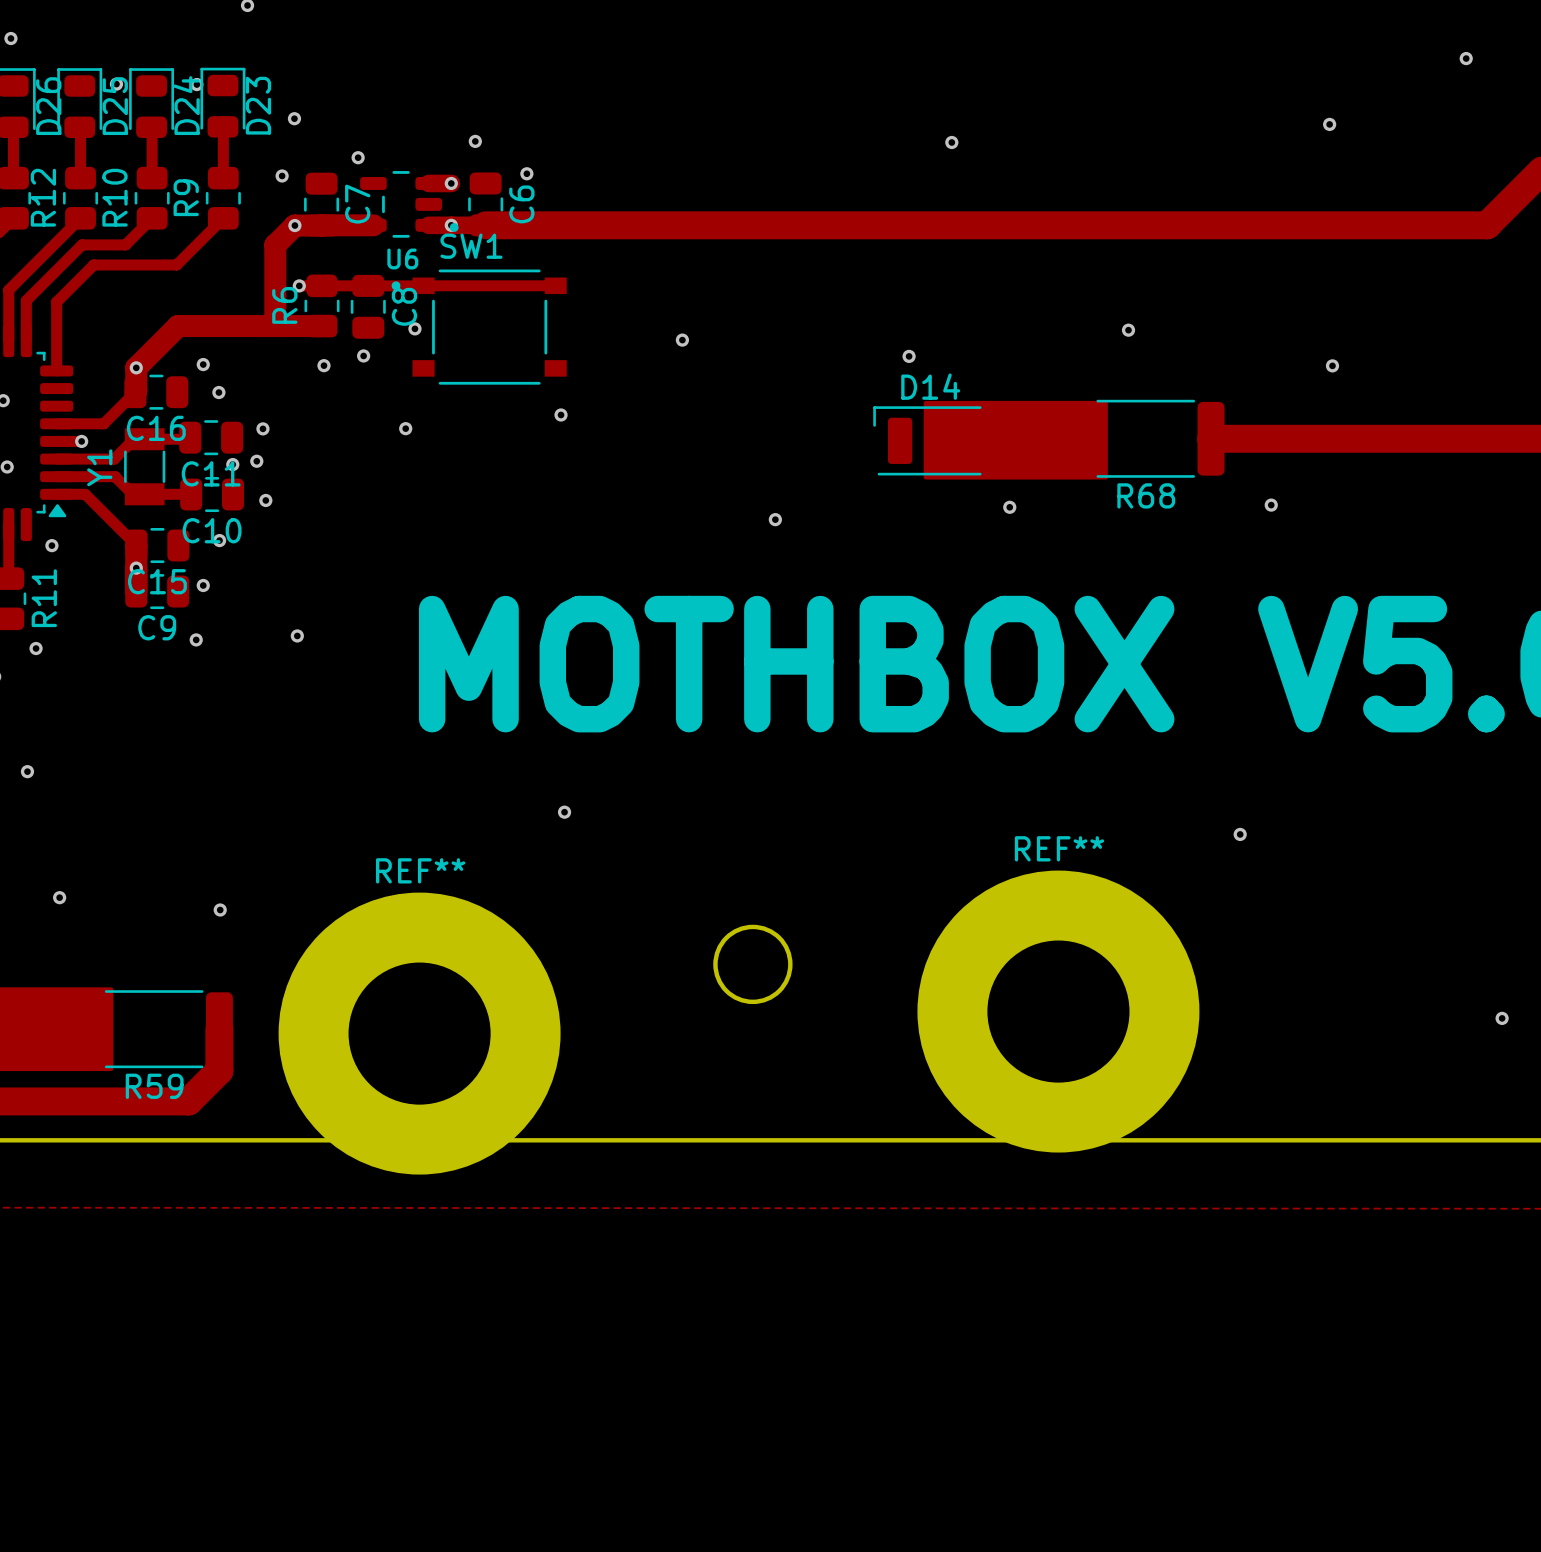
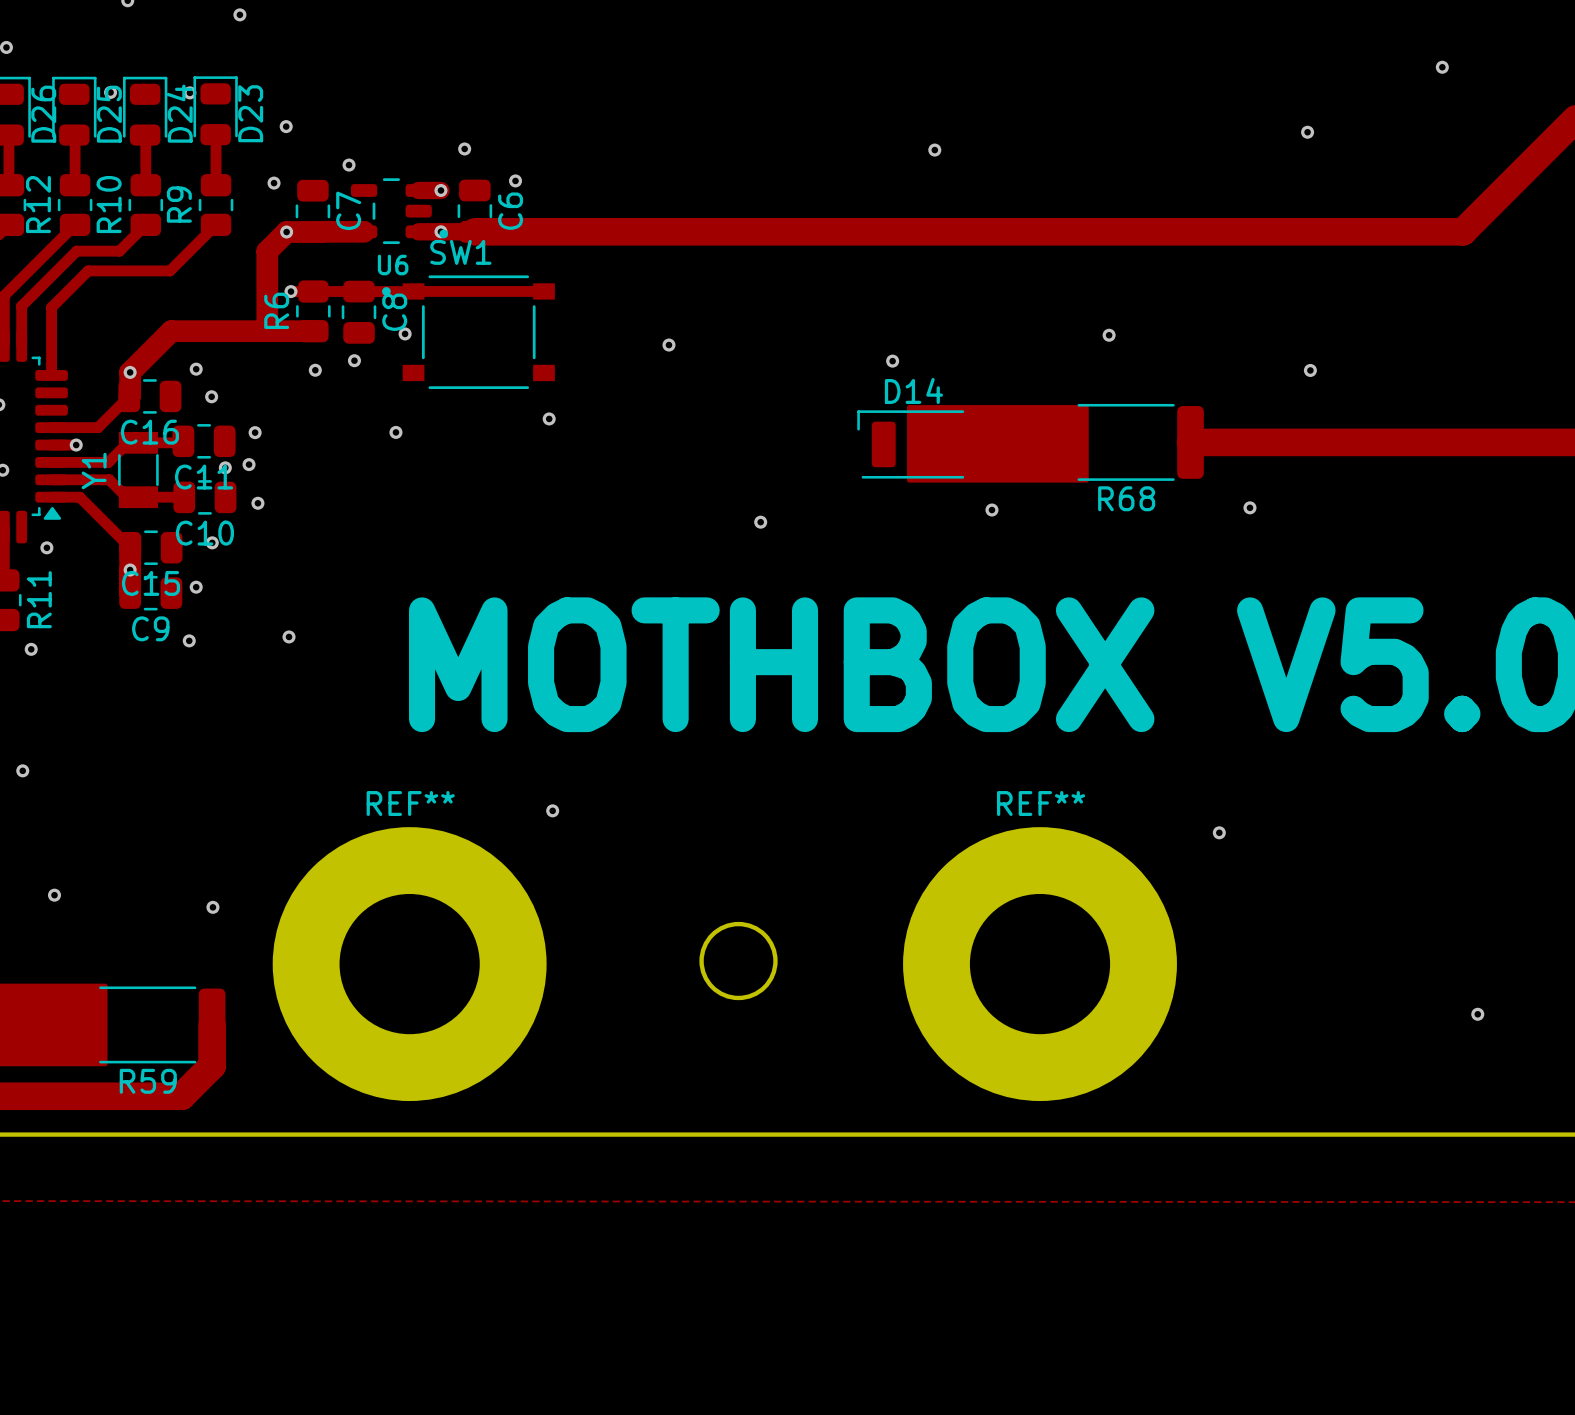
REF**: none -> (409, 964)
REF**: none -> (1040, 964)
REF**: (1058, 1011) -> none
REF**: (419, 1033) -> none

